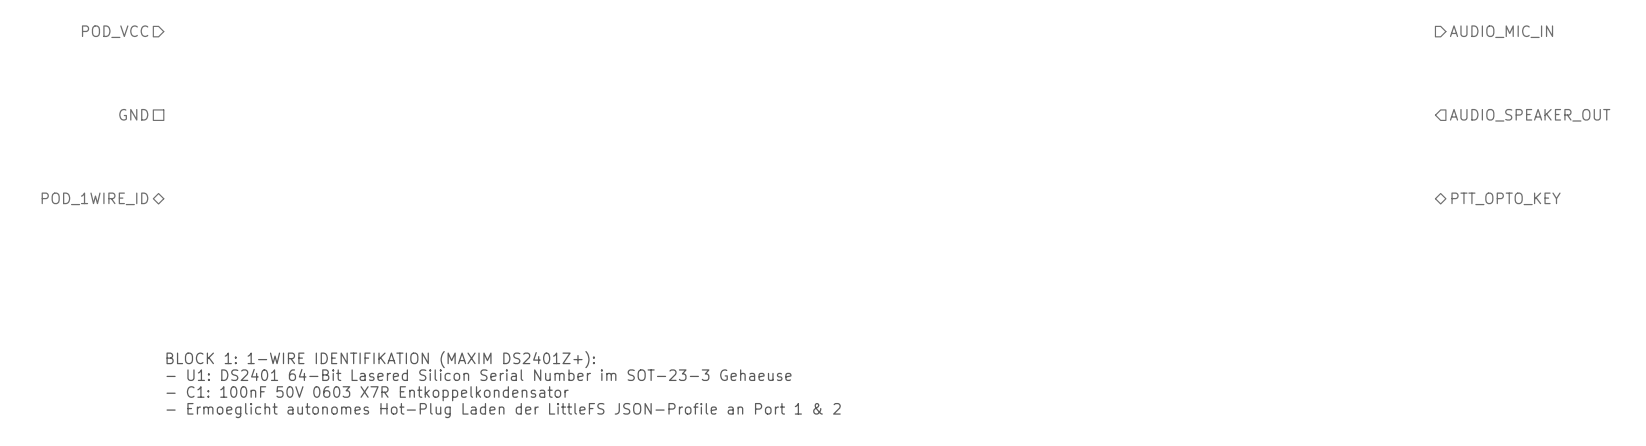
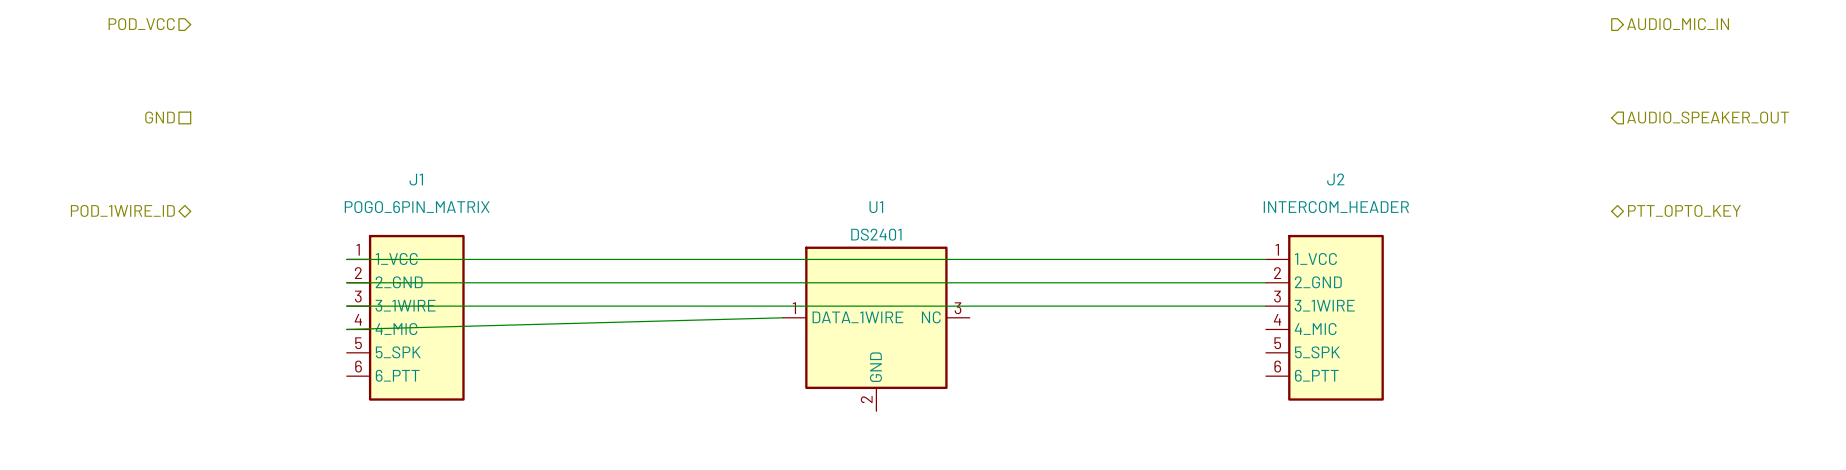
wire: none -> (346, 259) (1265, 259)
wire: none -> (346, 282) (1265, 282)
wire: none -> (346, 306) (1265, 306)
J1: none -> POGO_6PIN_MATRIX (405, 317)
wire: none -> (782, 317) (346, 329)
J2: none -> INTERCOM_HEADER (1324, 317)
U1: none -> DS2401 (876, 328)
text: BLOCK 1: 1-WIRE IDENTIFIKATION (MAXIM DS2401Z+): (380, 359) -> none
text: - U1: DS2401 64-Bit Lasered Silicon Serial Number im SOT-23-3 Gehaeuse (479, 374) -> none
text: - C1: 100nF 50V 0603 X7R Entkoppelkondensator (367, 393) -> none
text: - Ermoeglicht autonomes Hot-Plug Laden der LittleFS JSON-Profile an Port 1 & 2 (503, 410) -> none

